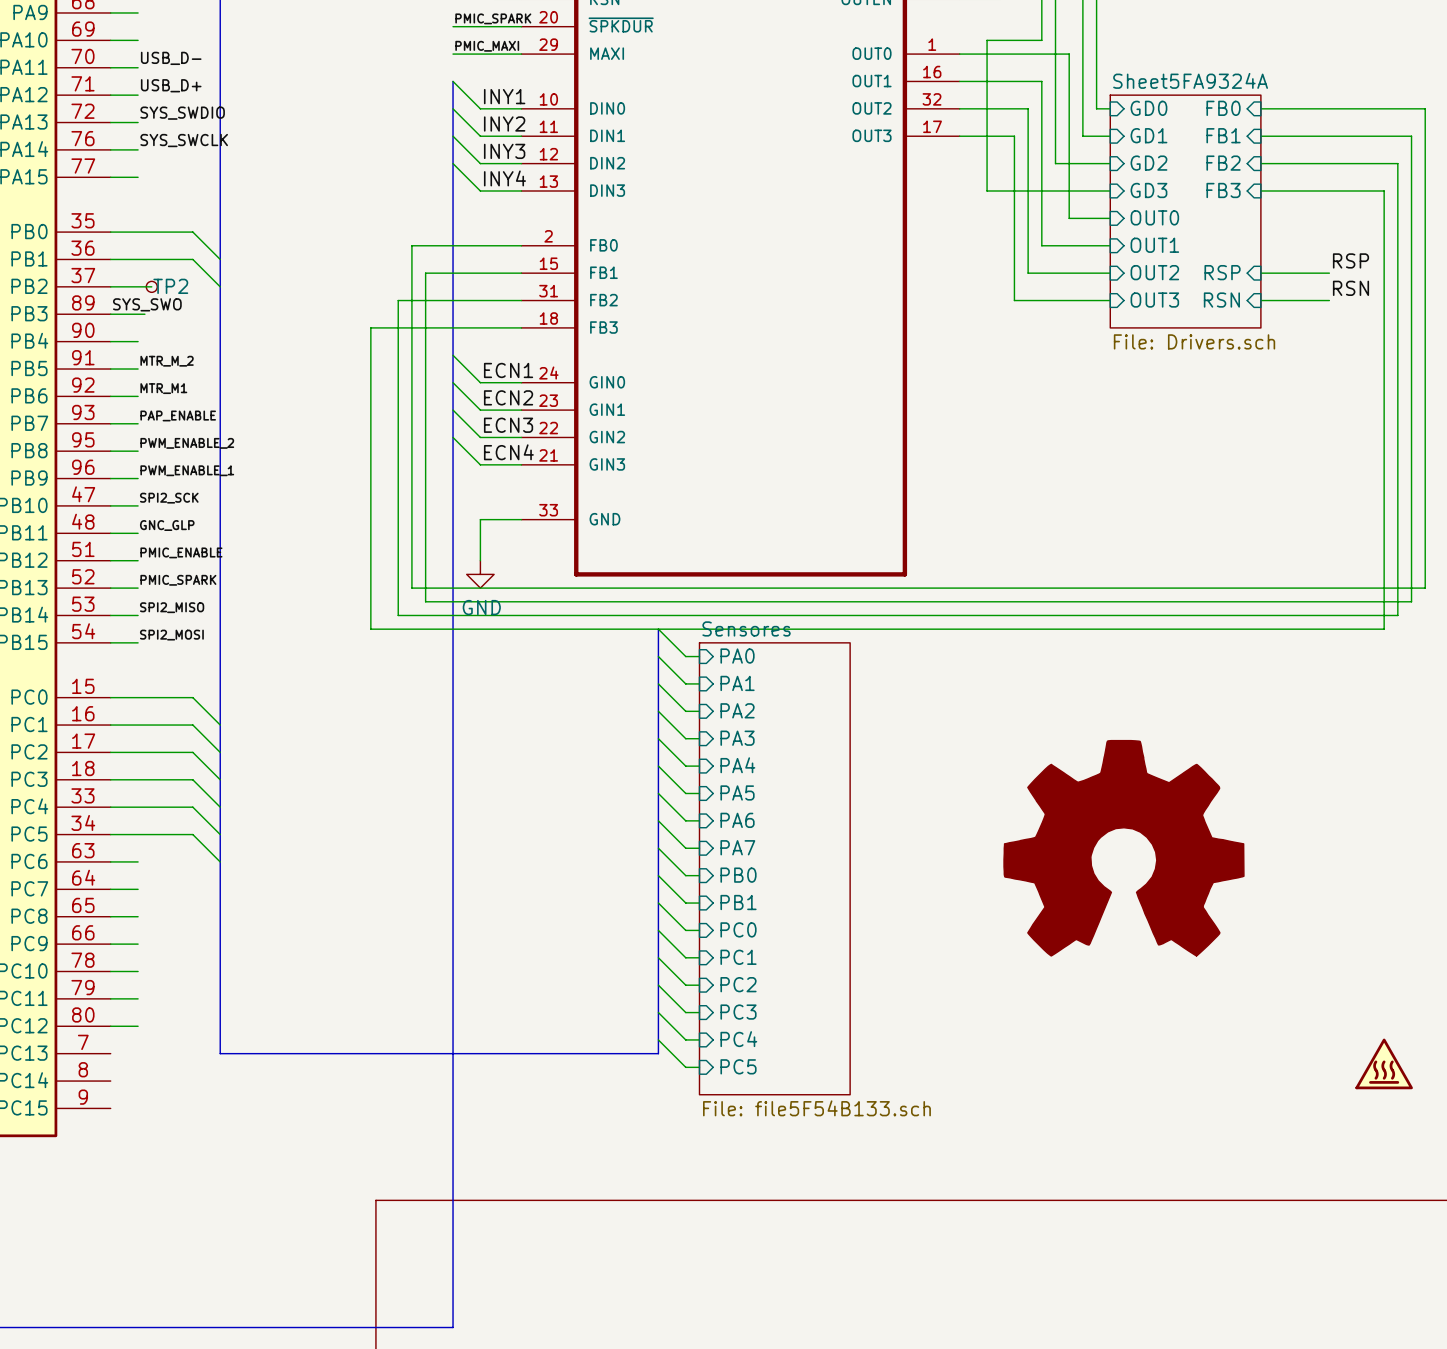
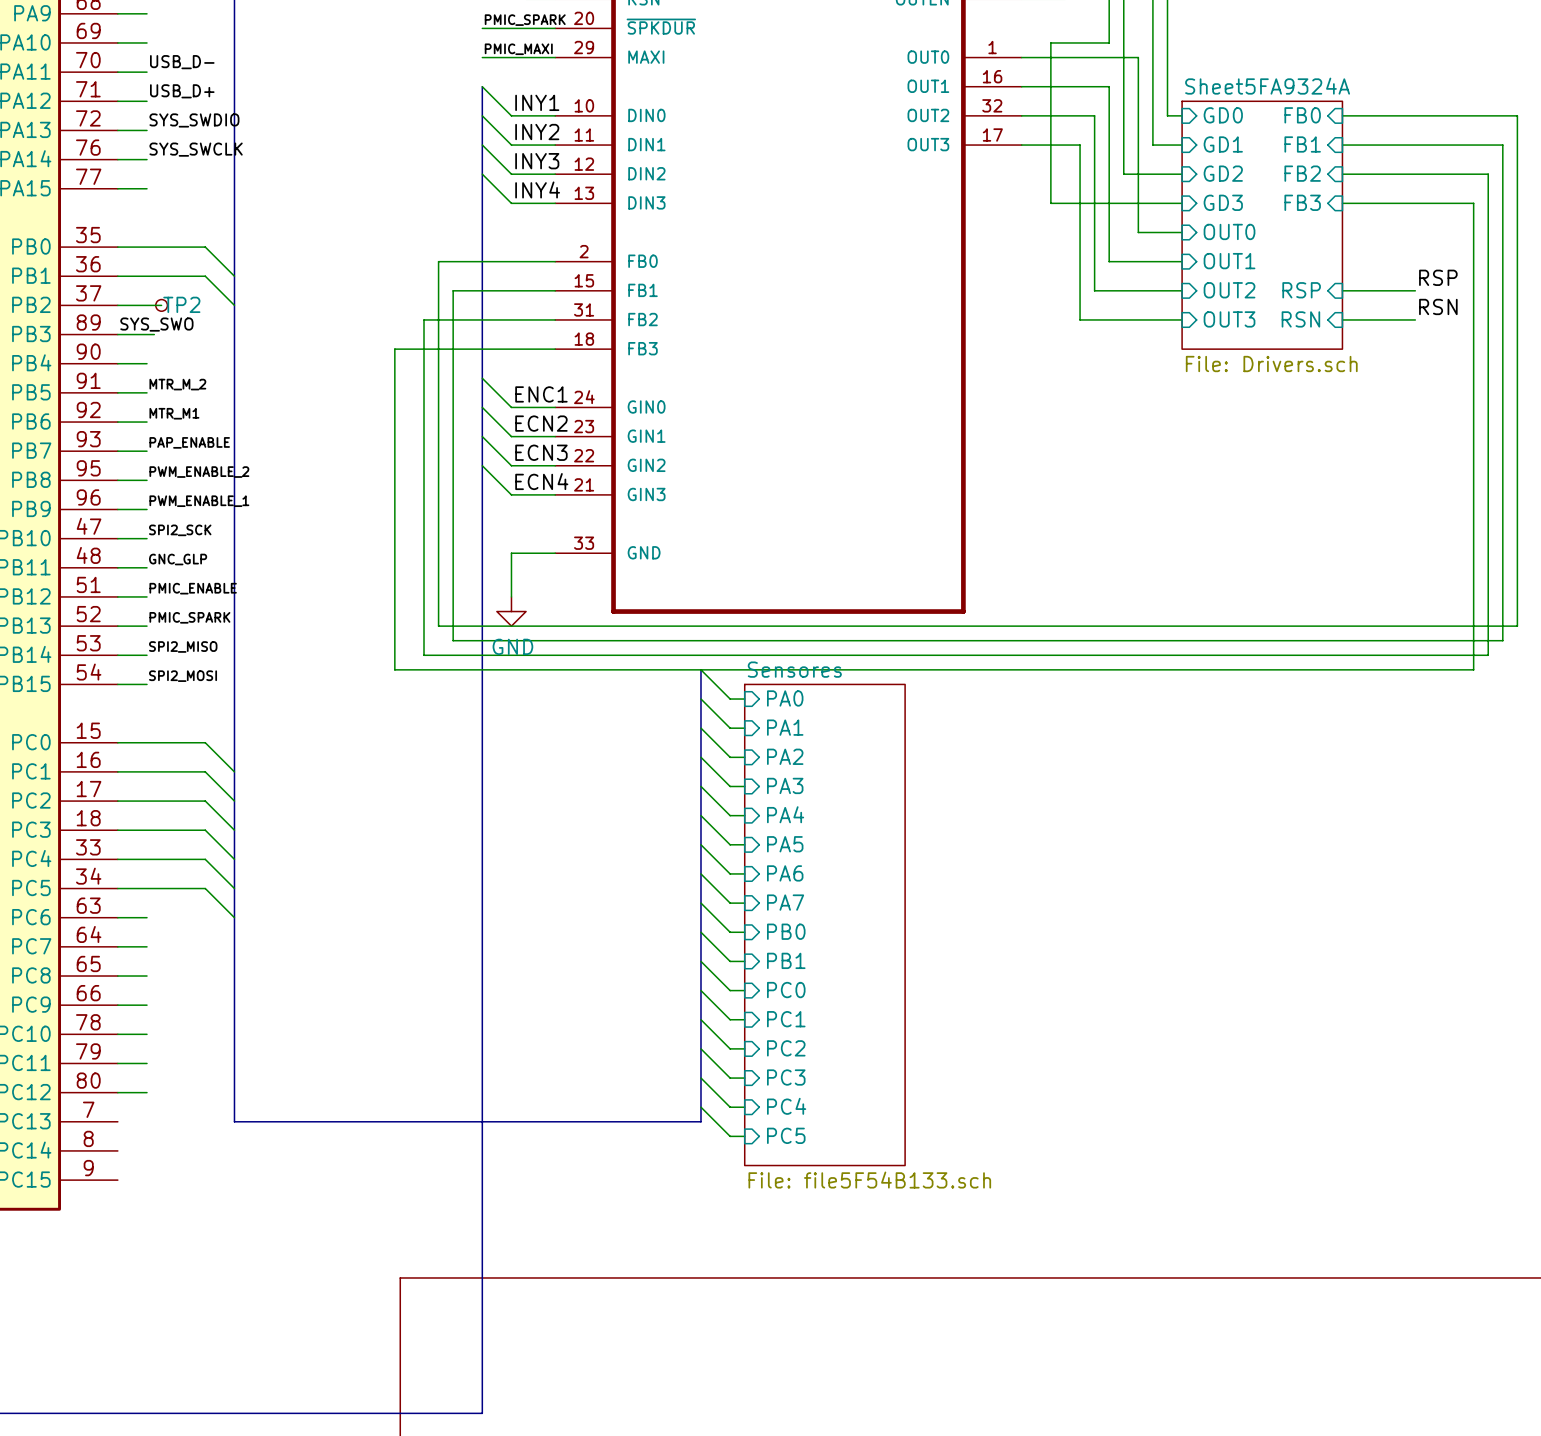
label: ECN1 (508, 370) -> ENC1 (541, 394)
part: (1123, 848) -> none
part: (1384, 1063) -> none

